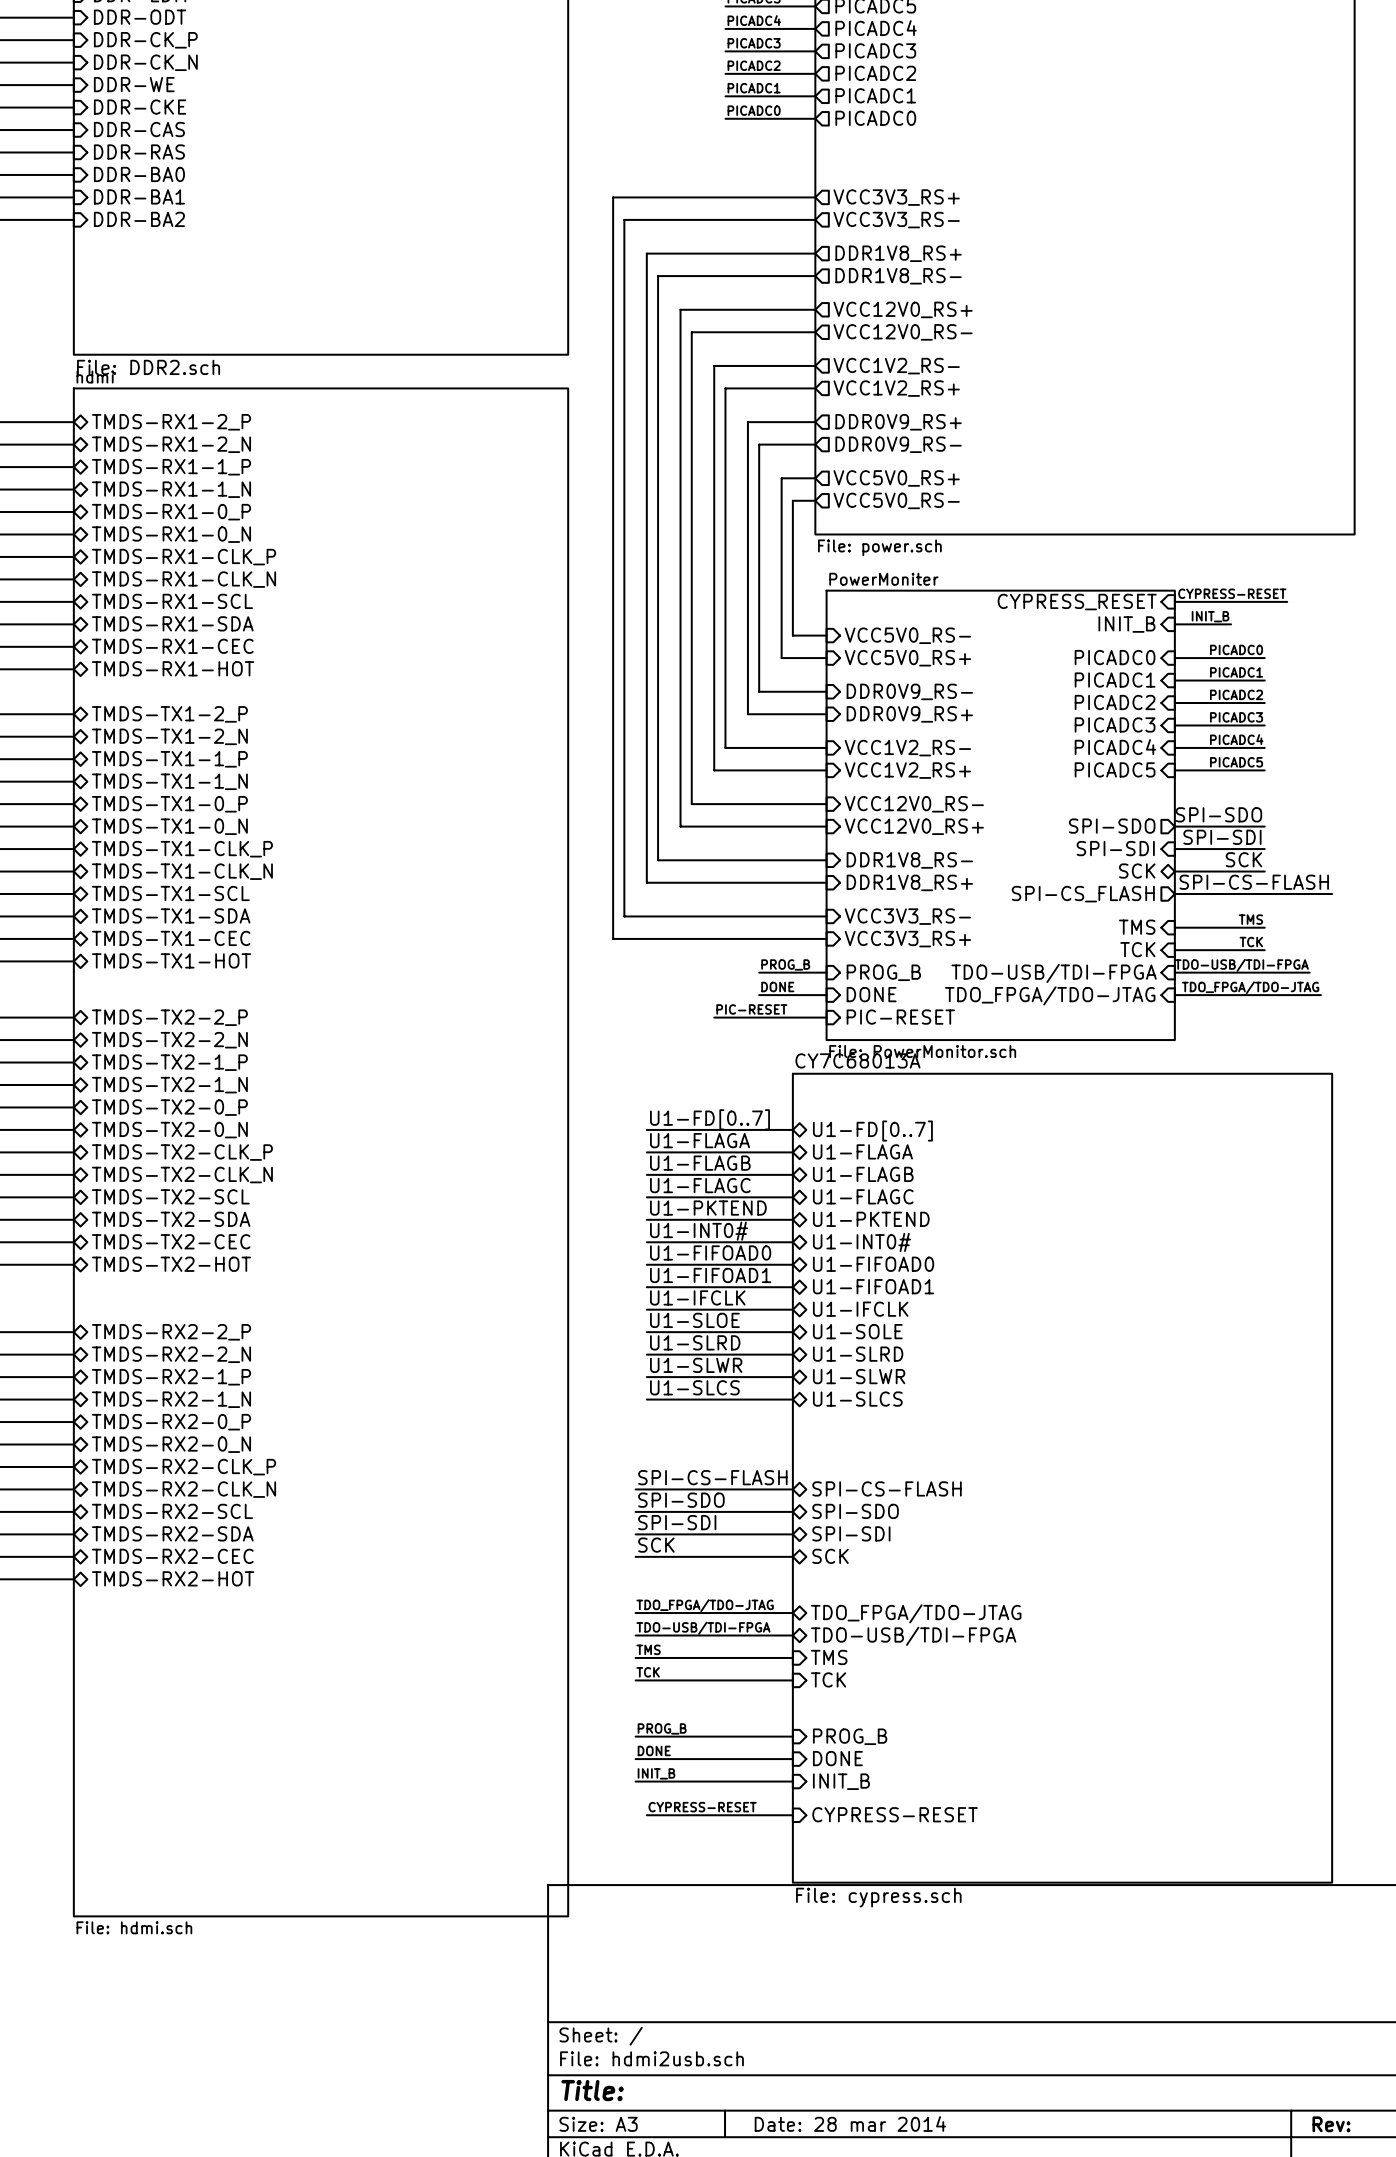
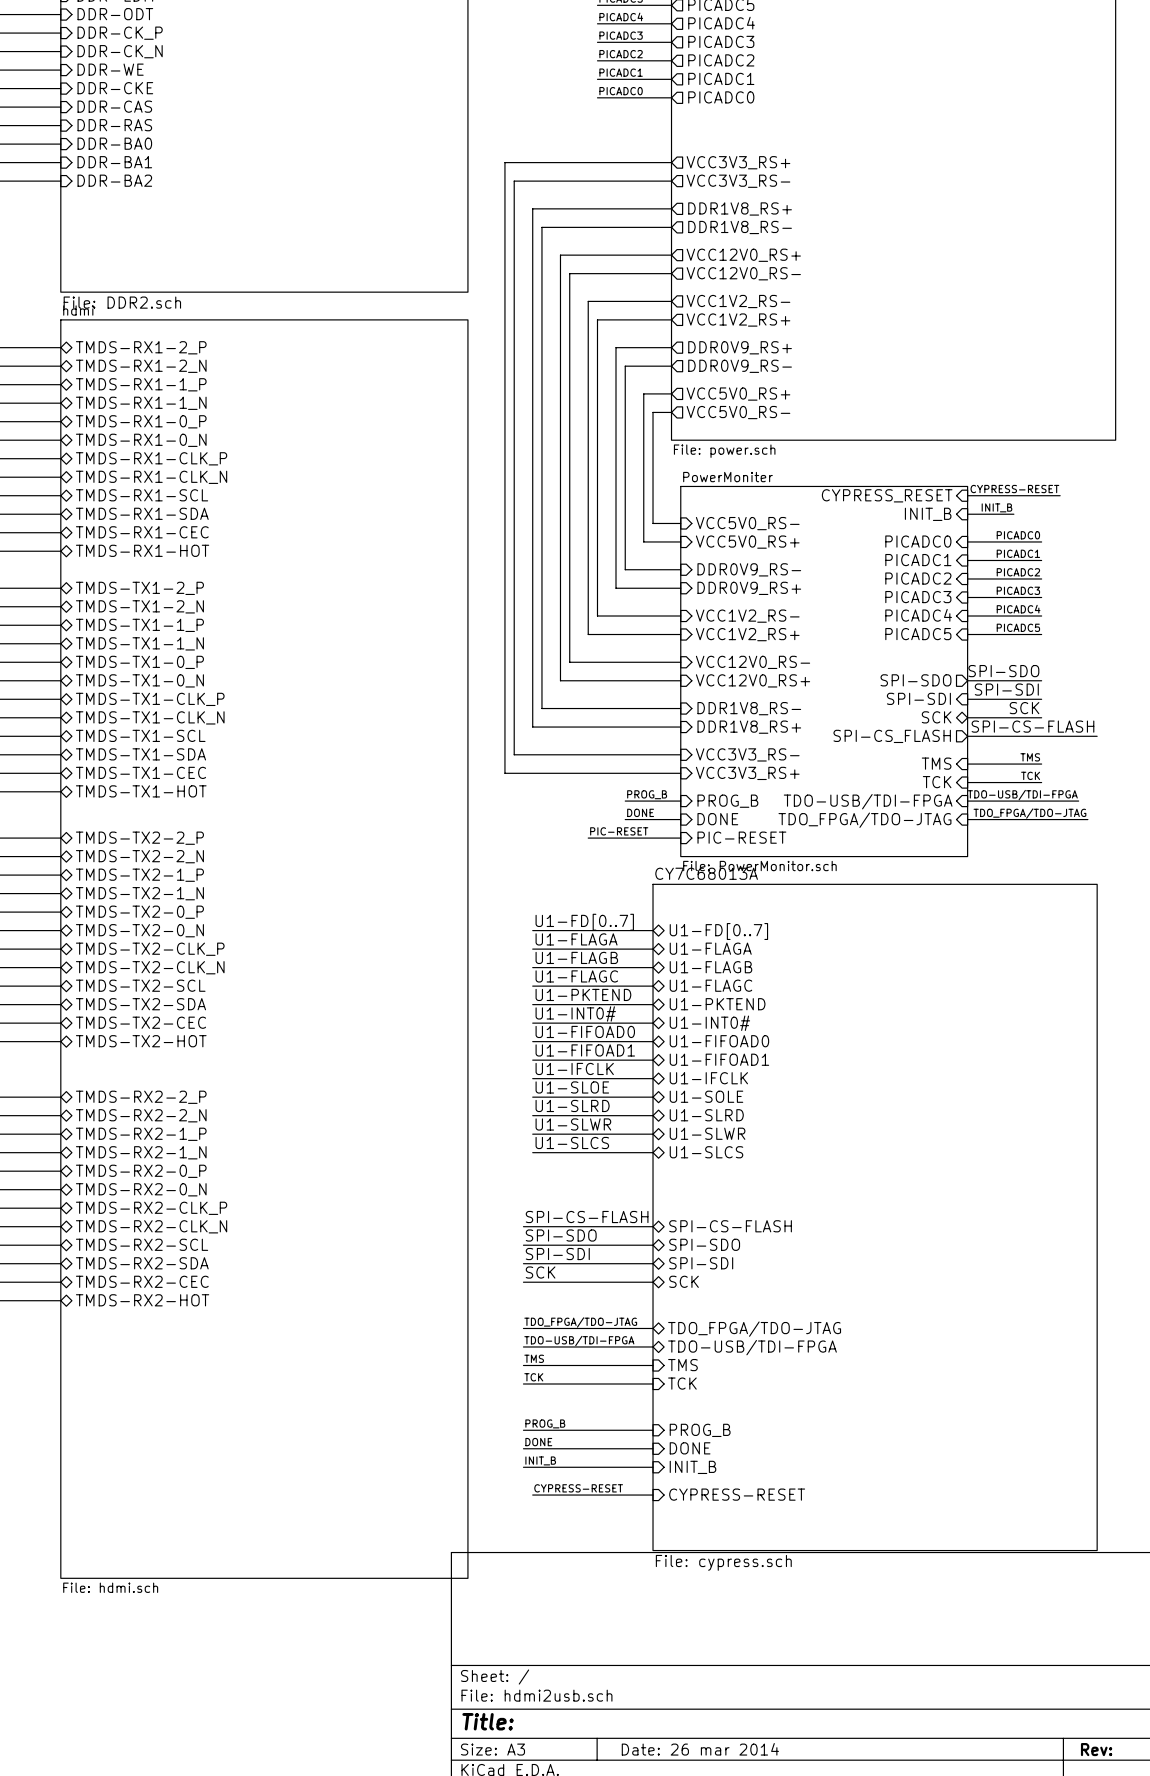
title block: Date: 28 mar 2014 (850, 2124) -> Date: 26 mar 2014 (700, 1749)

